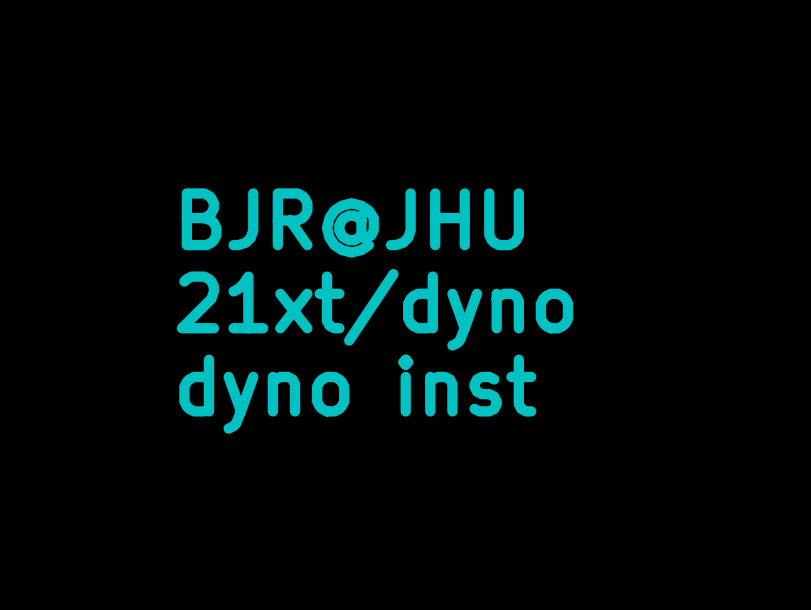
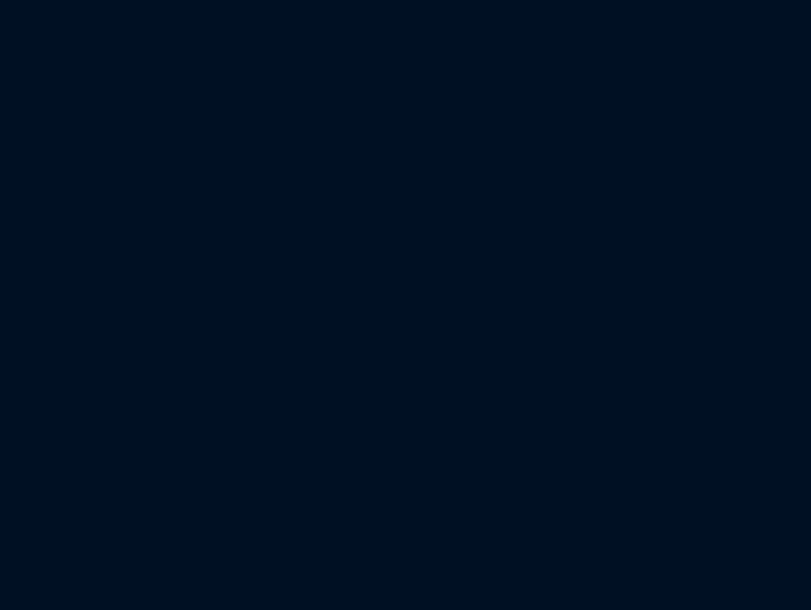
text: BJR@JHU (352, 222) -> none
text: 21xt/dyno (374, 309) -> none
text: dyno inst (357, 394) -> none

